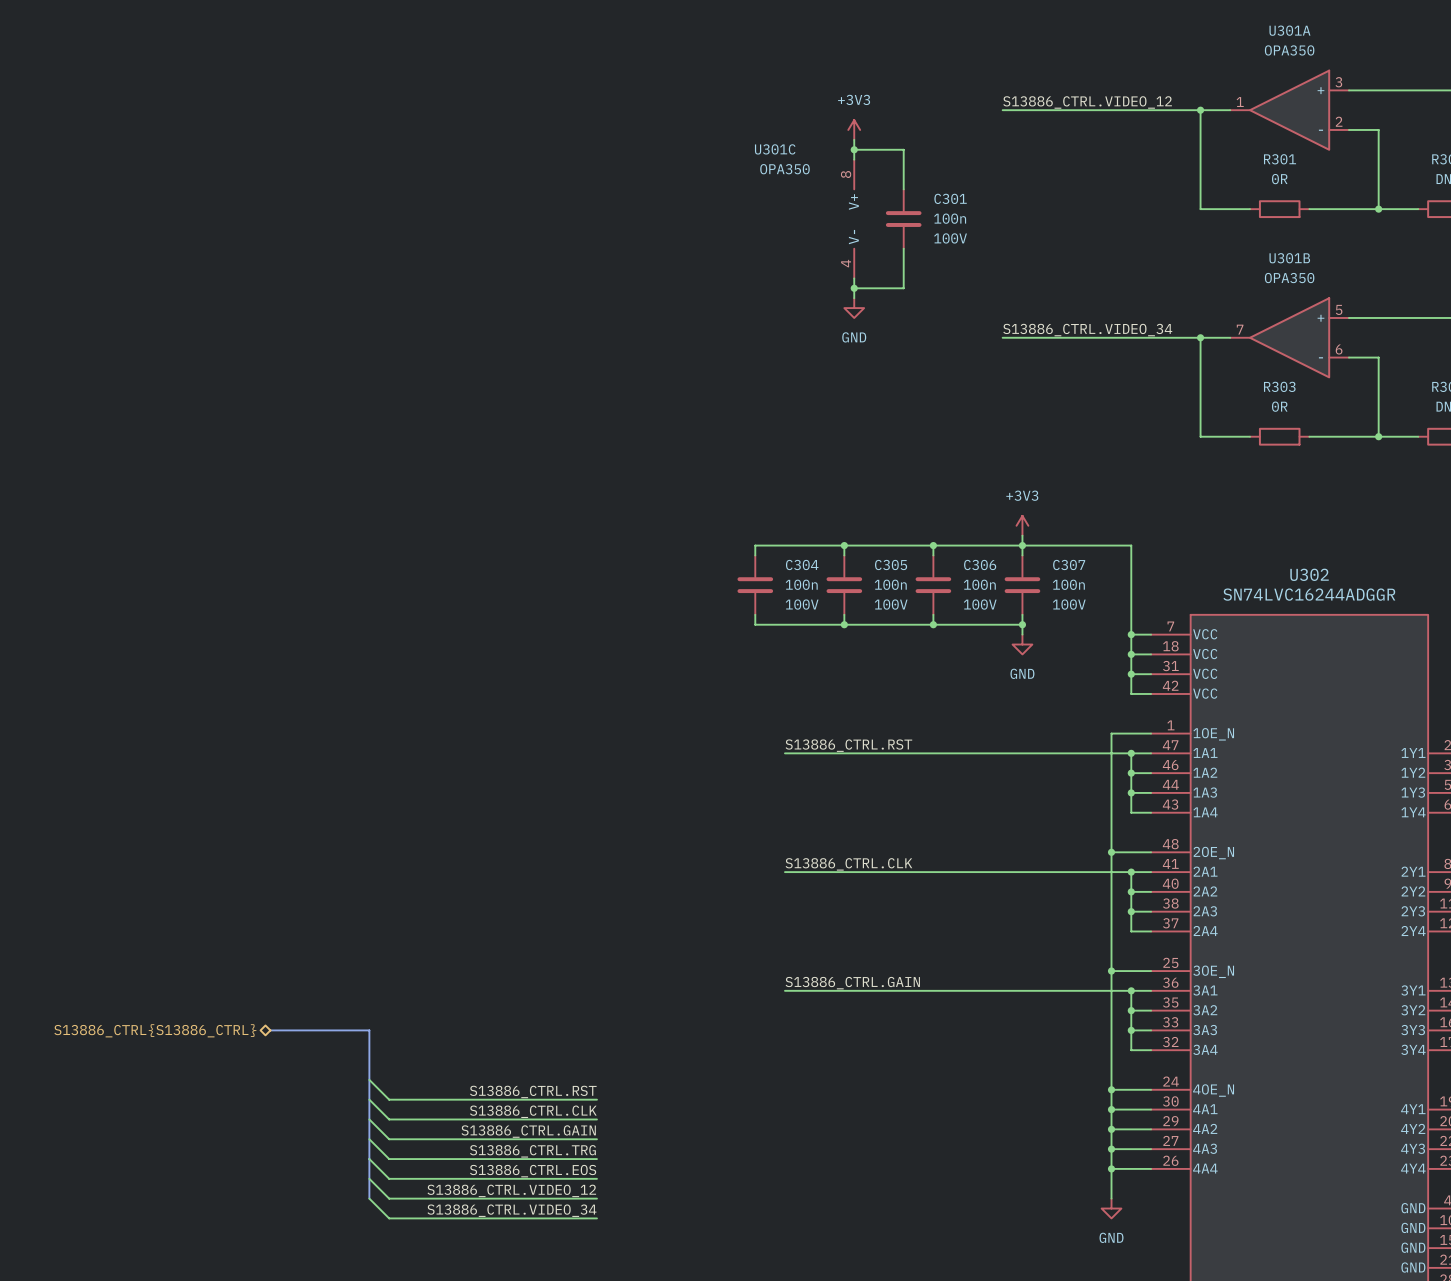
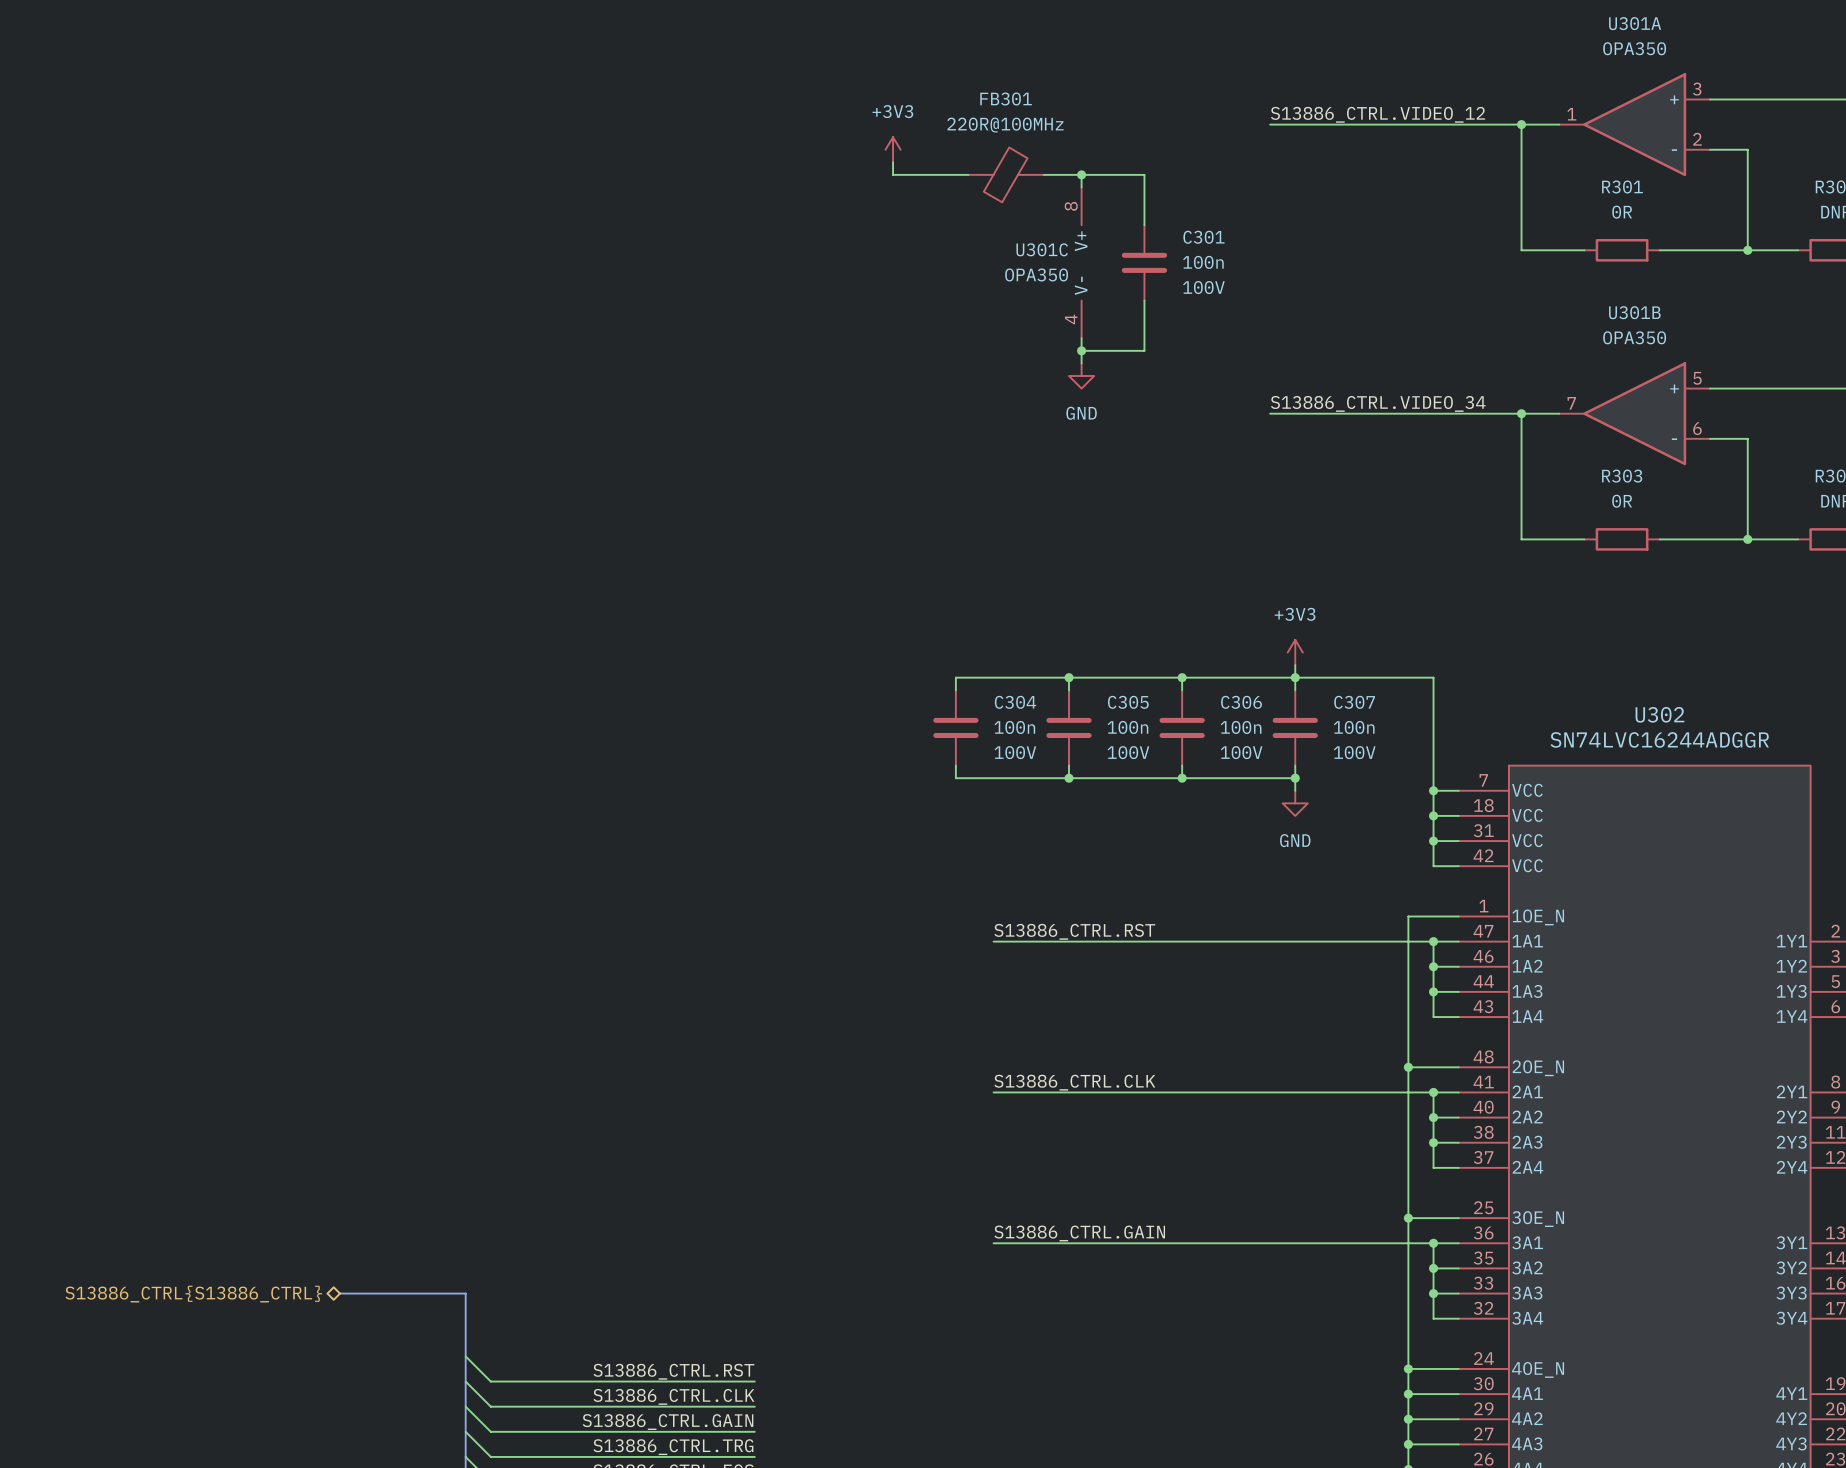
power symbol position: +3V3 (854, 129) -> +3V3 (893, 149)
wire: none -> (893, 162) (893, 174) (968, 174)
wire: (854, 139) (854, 149) -> (1043, 174) (1081, 174)
U301C name position: U301C (775, 149) -> U301C (1042, 249)
FB301: none -> 220R@100MHz (1006, 174)
U301C value position: OPA350 (784, 169) -> OPA350 (1036, 274)

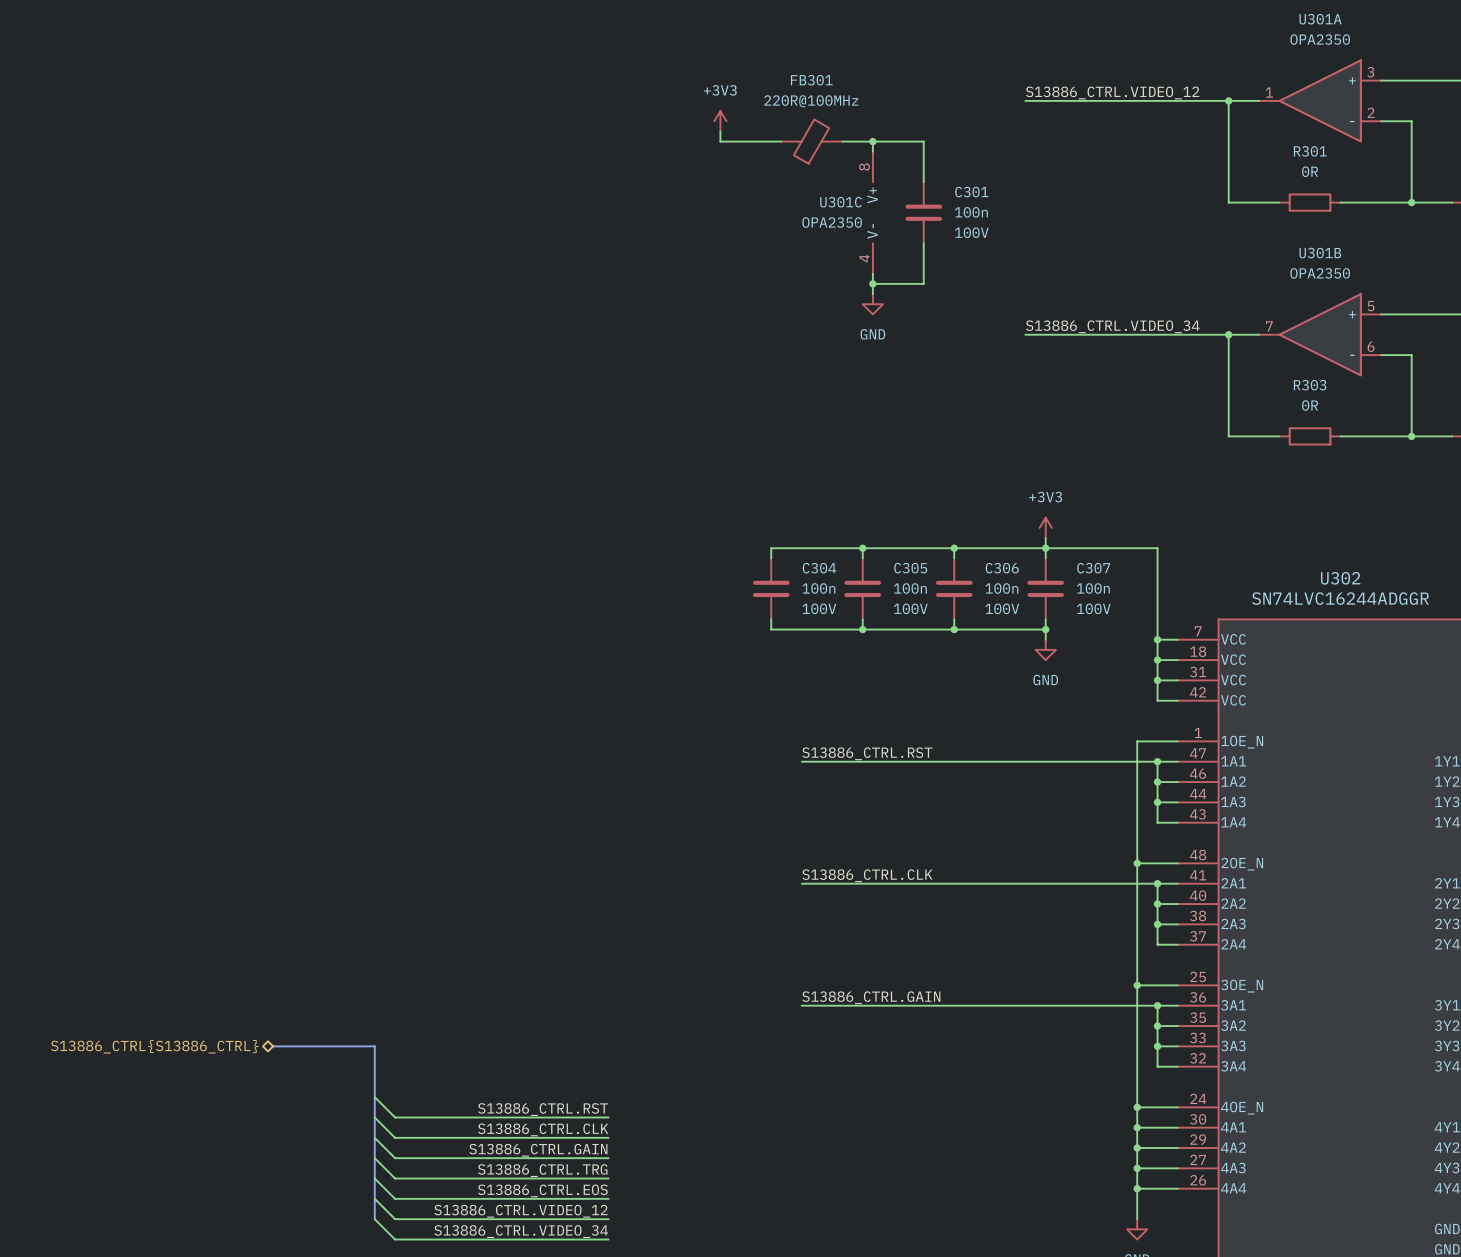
U301A value: OPA350 (1634, 48) -> OPA2350 (1320, 39)
U301C value: OPA350 (1036, 274) -> OPA2350 (832, 222)
U301B value: OPA350 (1634, 337) -> OPA2350 (1320, 273)

